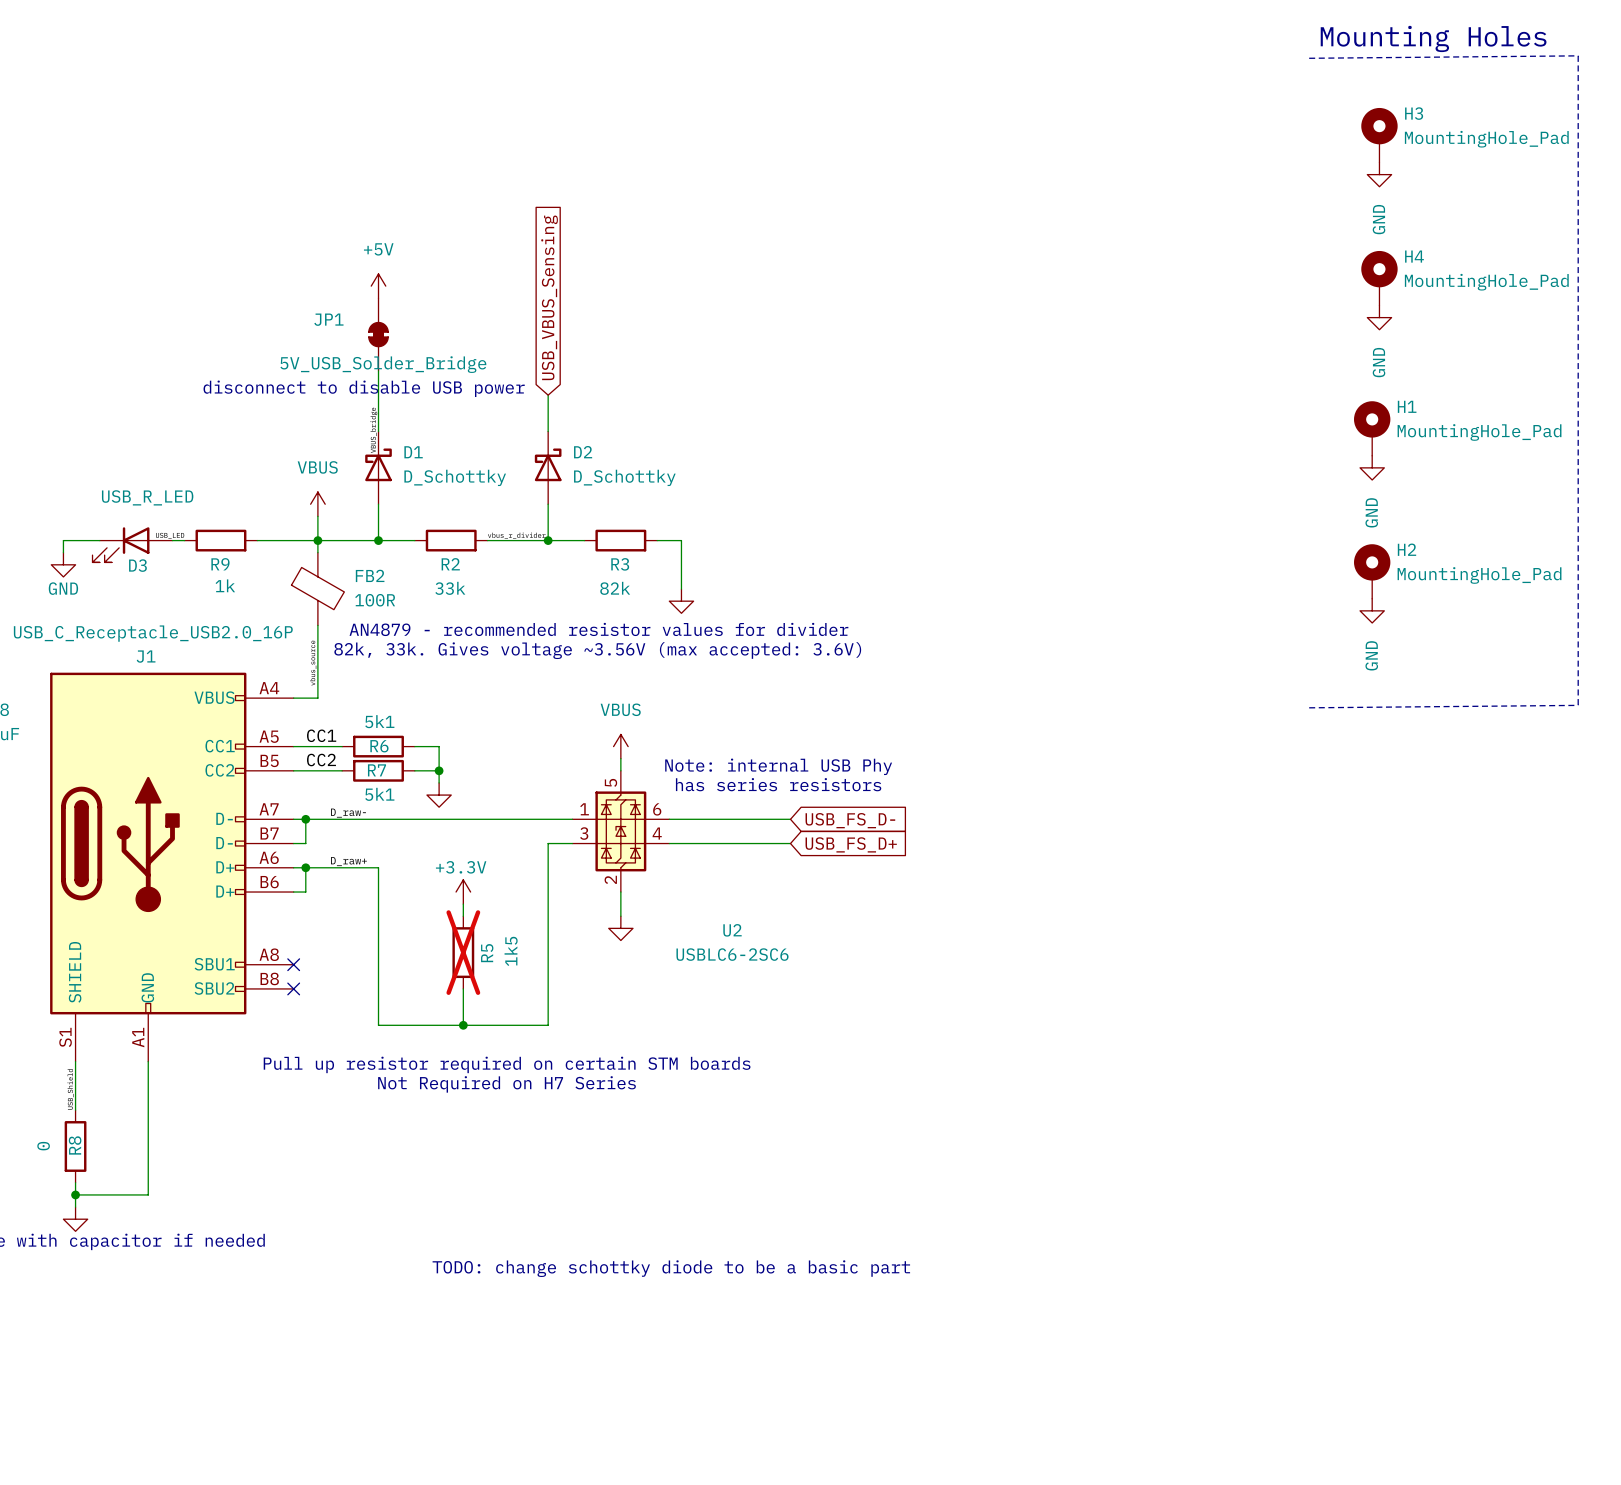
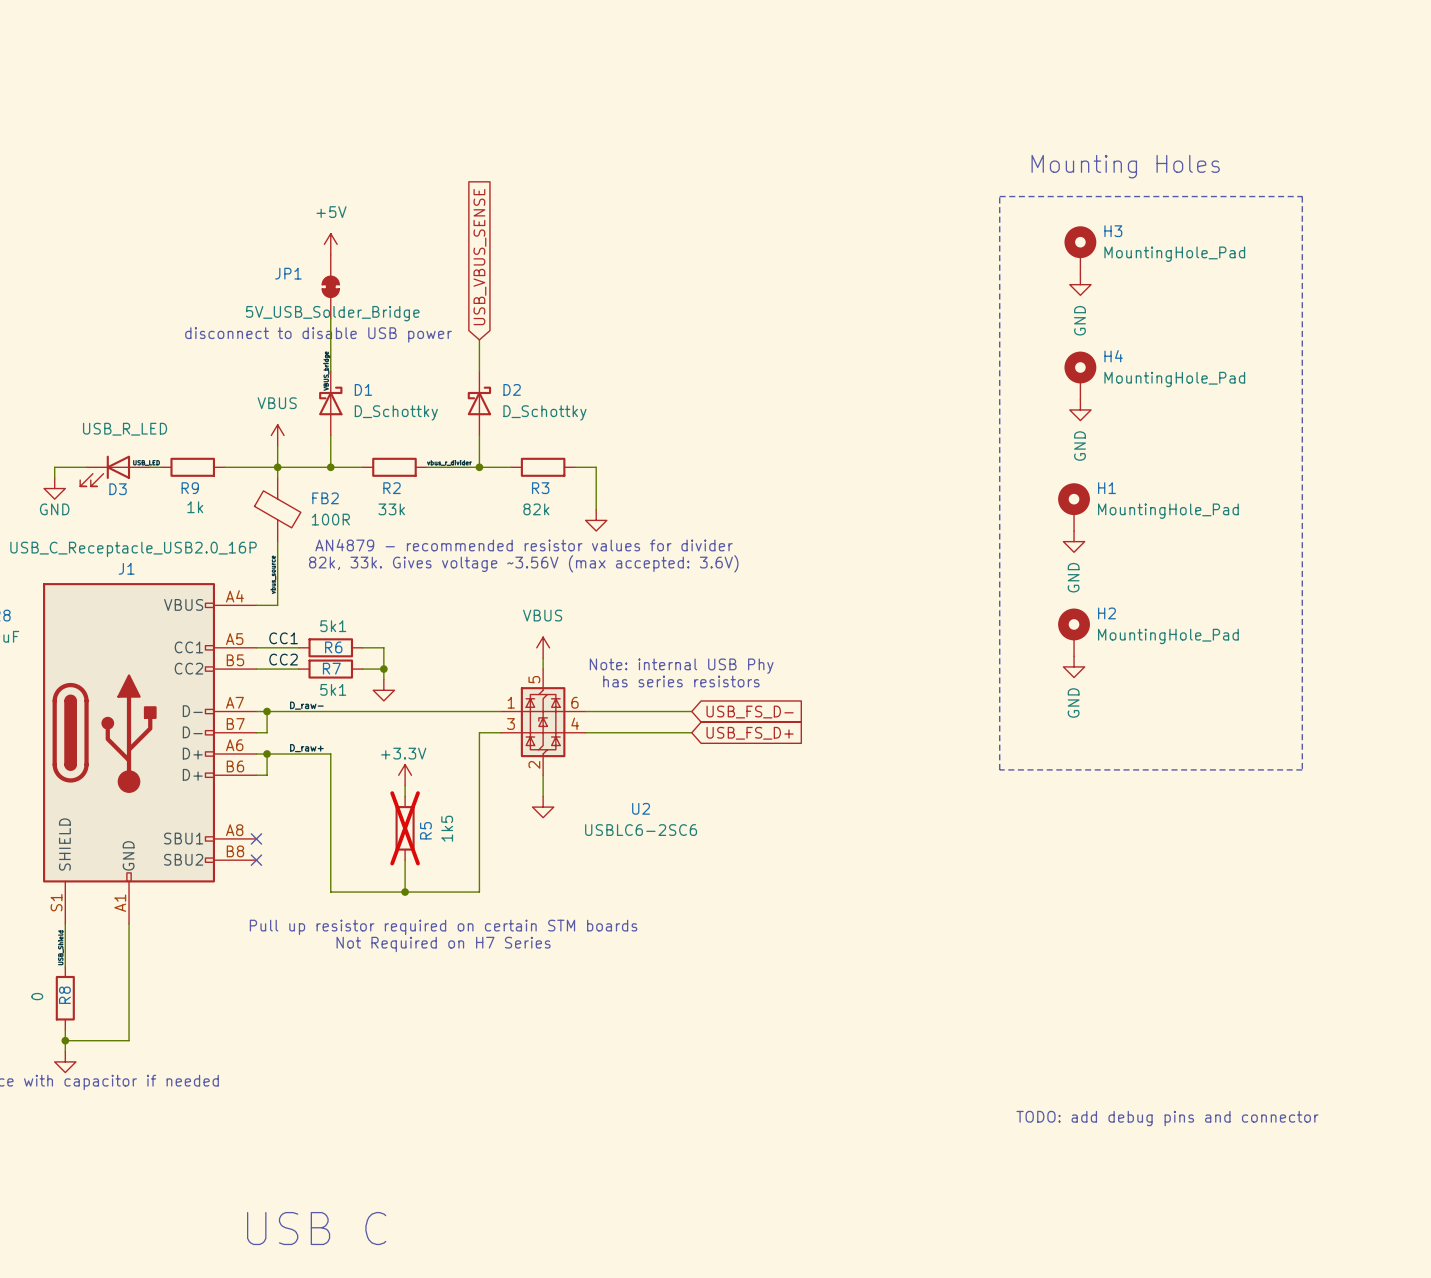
text position: Mounting Holes (1433, 38) -> Mounting Holes (1125, 166)
line: (1309, 58) (1578, 55) (1578, 705) (1309, 707) -> none
H3 position: (1379, 135) -> (1080, 250)
power symbol: GND (1379, 174) -> none
line: none -> (999, 196) (1302, 196) (1302, 769) (999, 769) (999, 196)
H4 position: (1379, 278) -> (1080, 375)
global label: USB_VBUS_Sensing (549, 297) -> USB_VBUS_SENSE (479, 257)
power symbol: GND (1379, 317) -> none
power symbol: none -> GND (1080, 284)
H1 position: (1372, 428) -> (1074, 507)
power symbol: GND (1372, 467) -> none
power symbol: none -> GND (1080, 409)
H2 position: (1372, 571) -> (1074, 632)
power symbol: GND (1372, 610) -> none
power symbol: none -> GND (1074, 541)
power symbol: none -> GND (1074, 666)
text: TODO: change schottky diode to be a basic part (671, 1268) -> none
text: none -> TODO: add debug pins and connector (1167, 1118)
text: none -> USB C (316, 1228)

